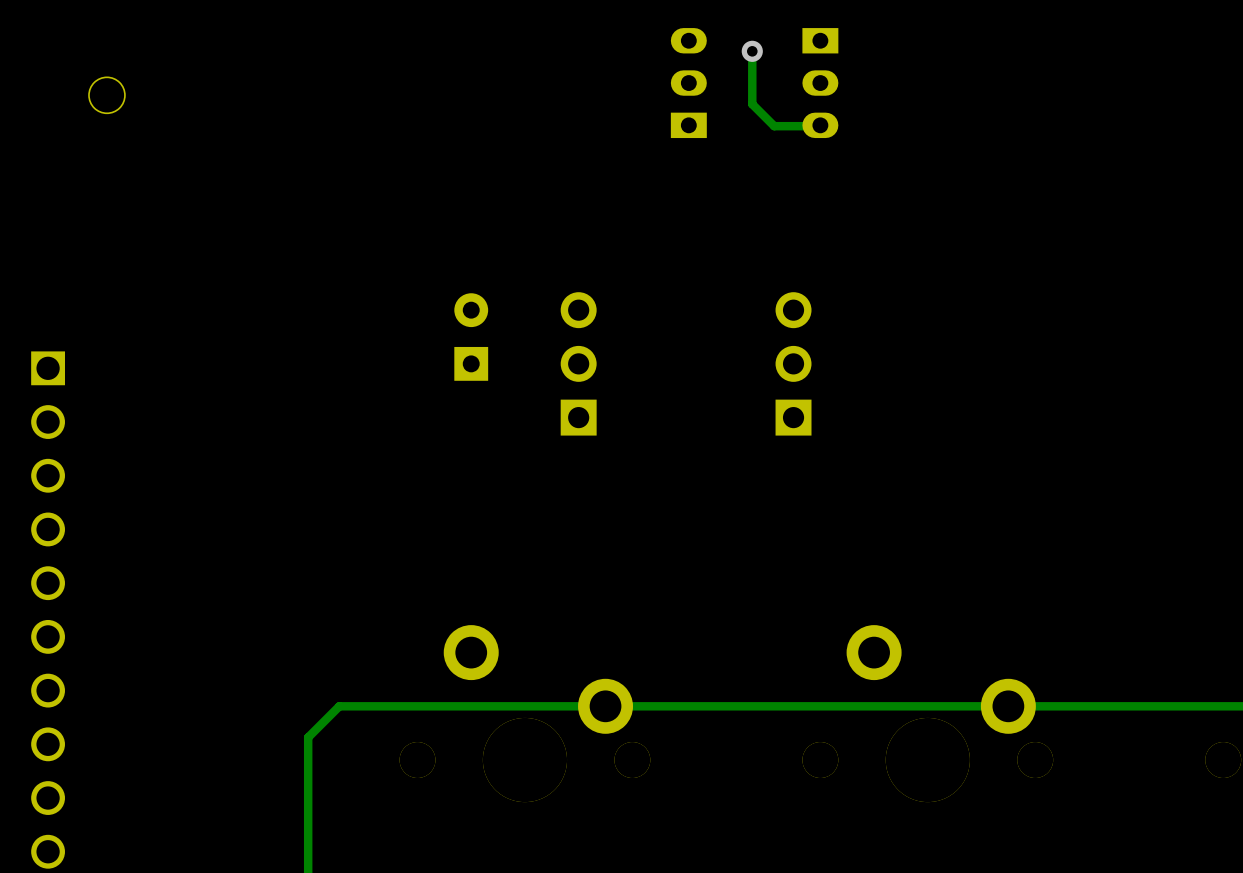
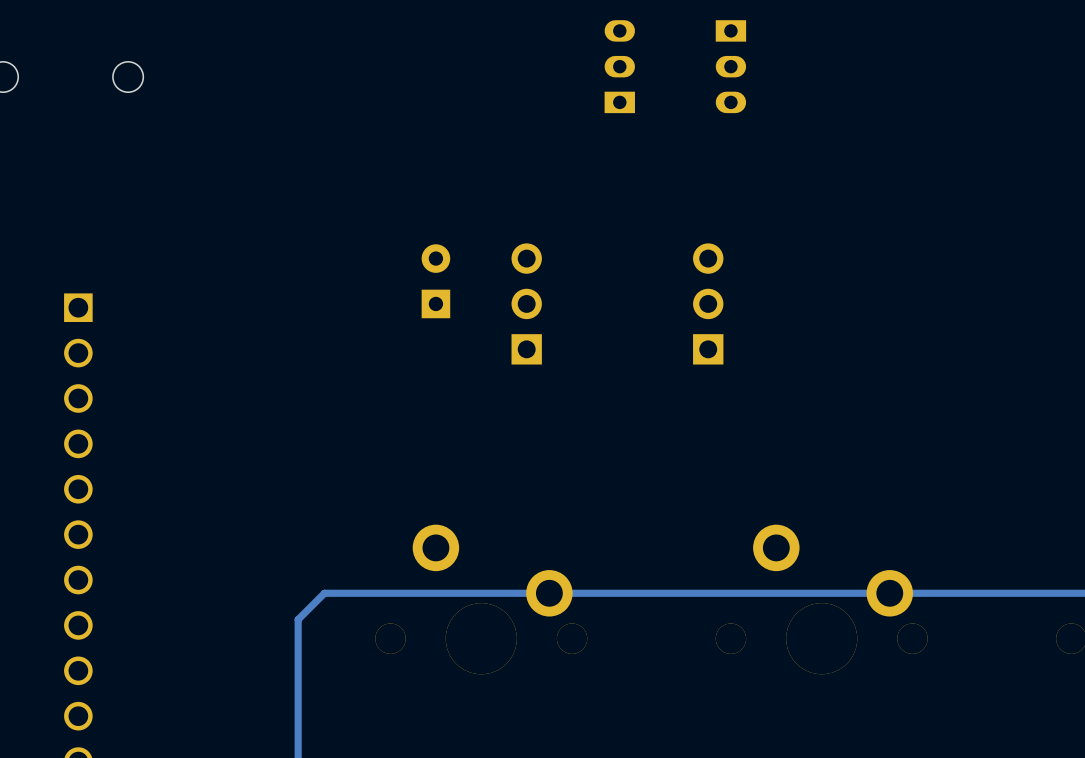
track: (752, 51) (752, 104) (774, 126) (820, 126) -> none
via: (752, 51) -> none

